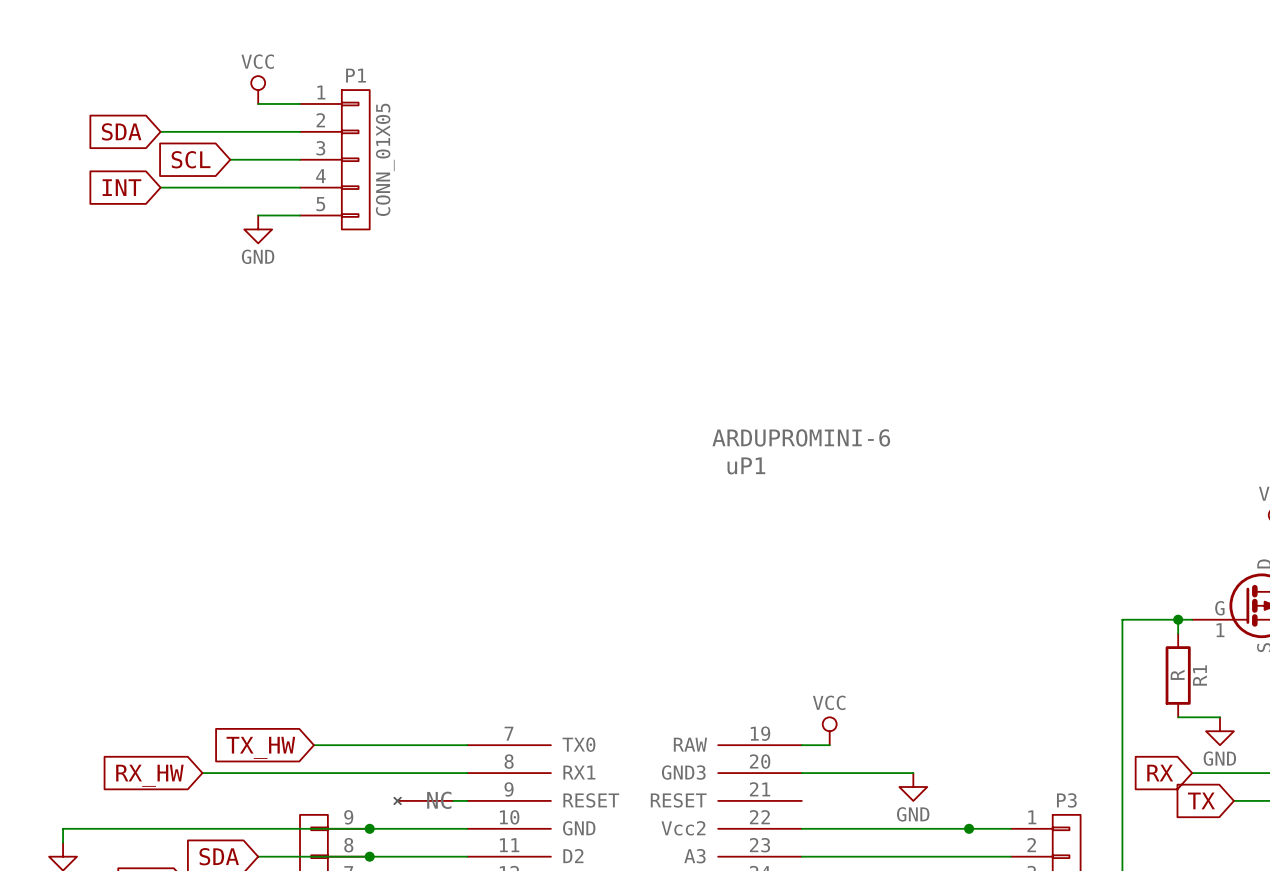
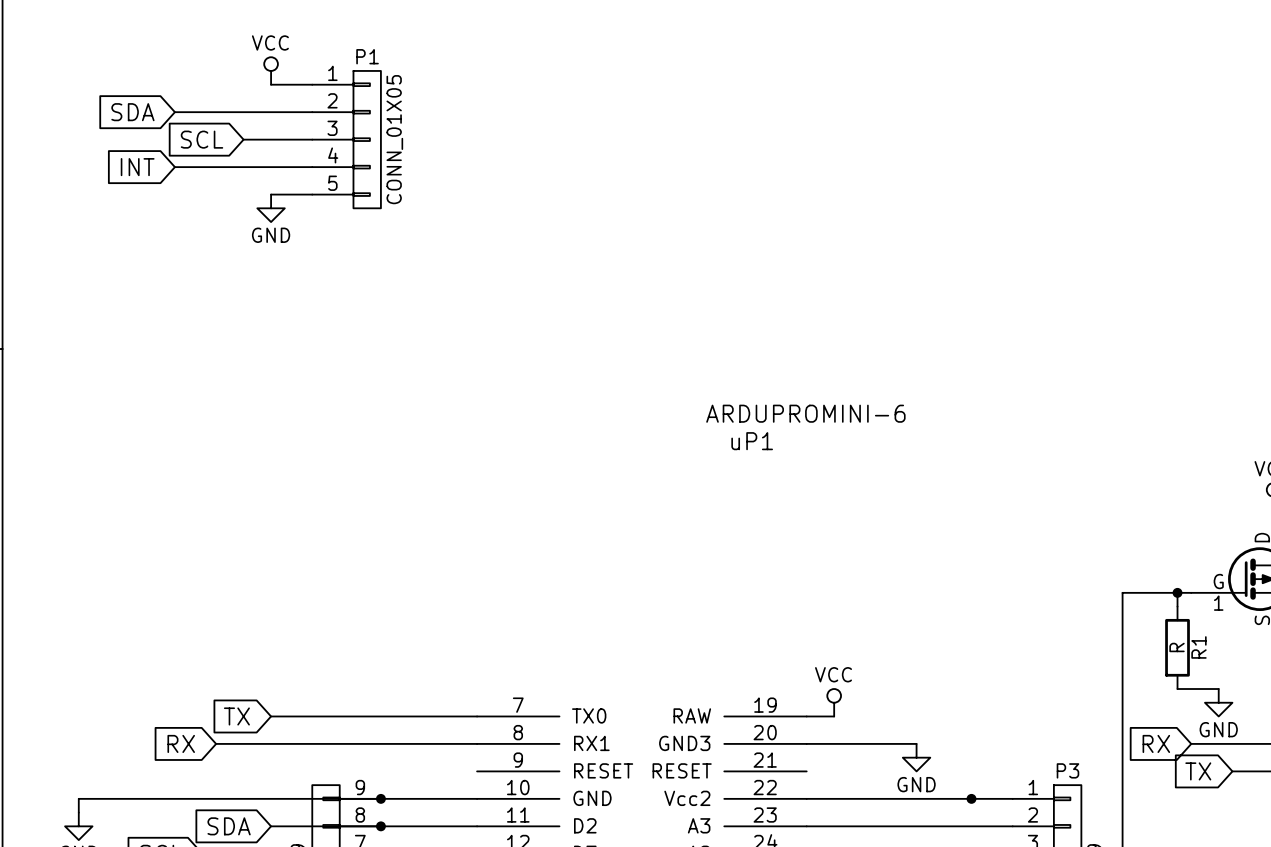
global label: none -> TX (236, 716)
wire: none -> (271, 716) (326, 716)
global label: TX_HW (260, 747) -> none
global label: RX_HW (149, 775) -> RX (181, 743)
power symbol: NC (423, 800) -> none
wire: (453, 800) (467, 800) -> none

